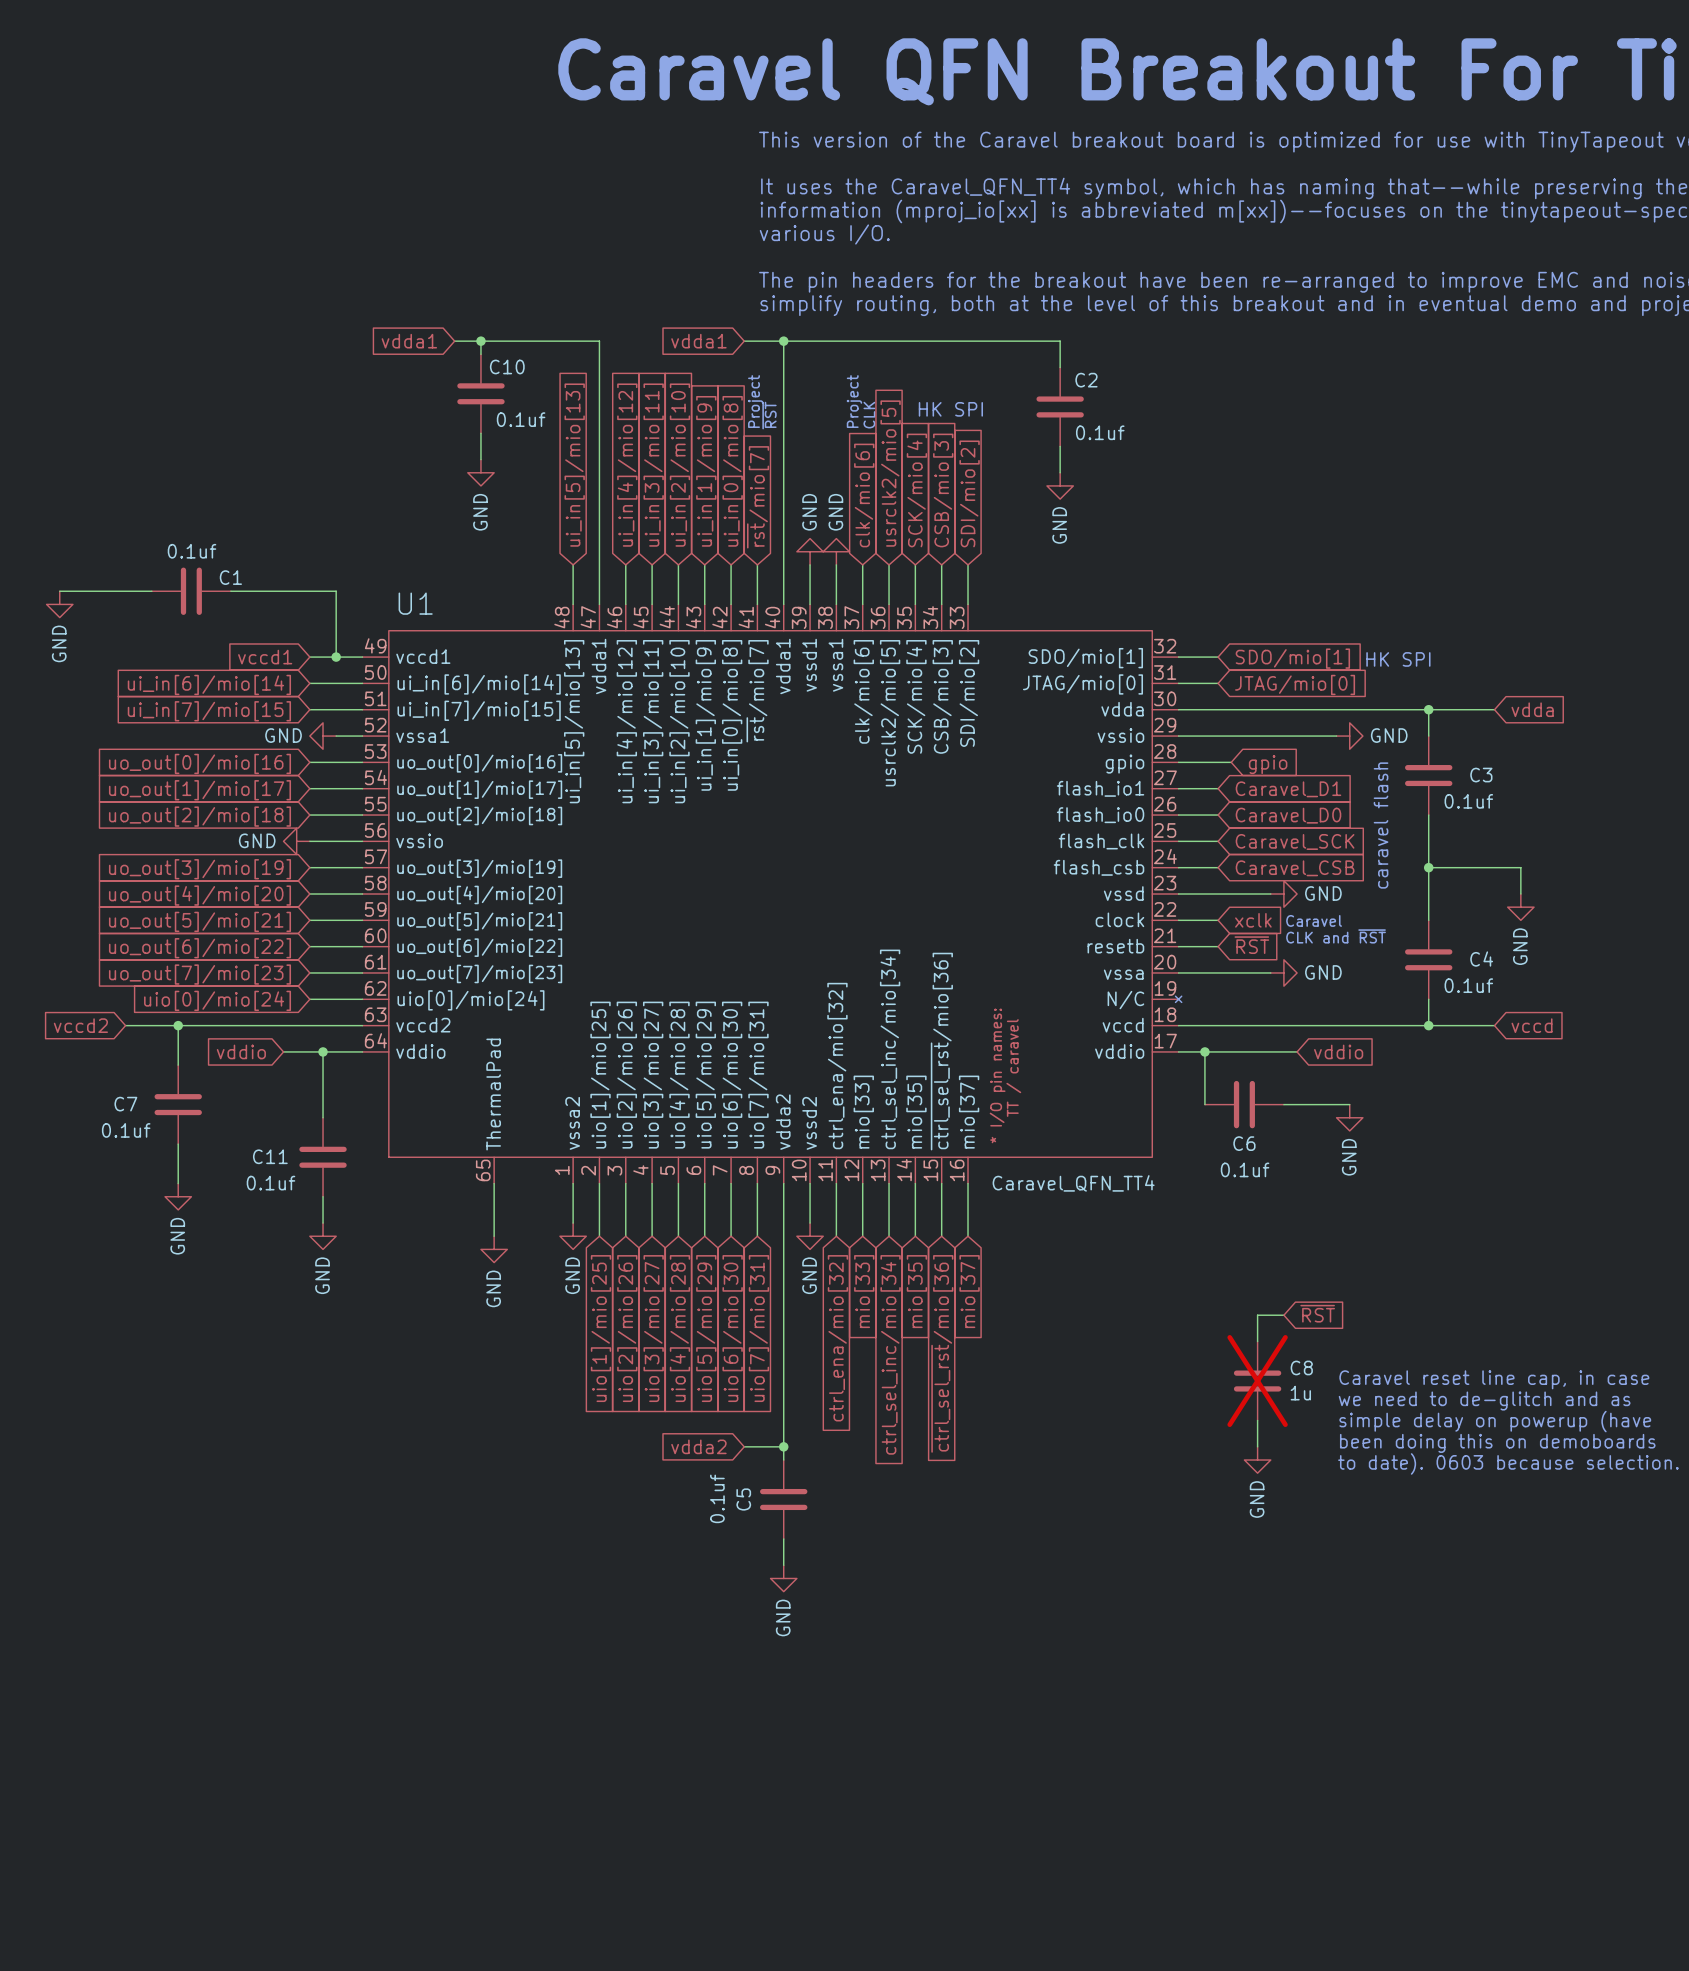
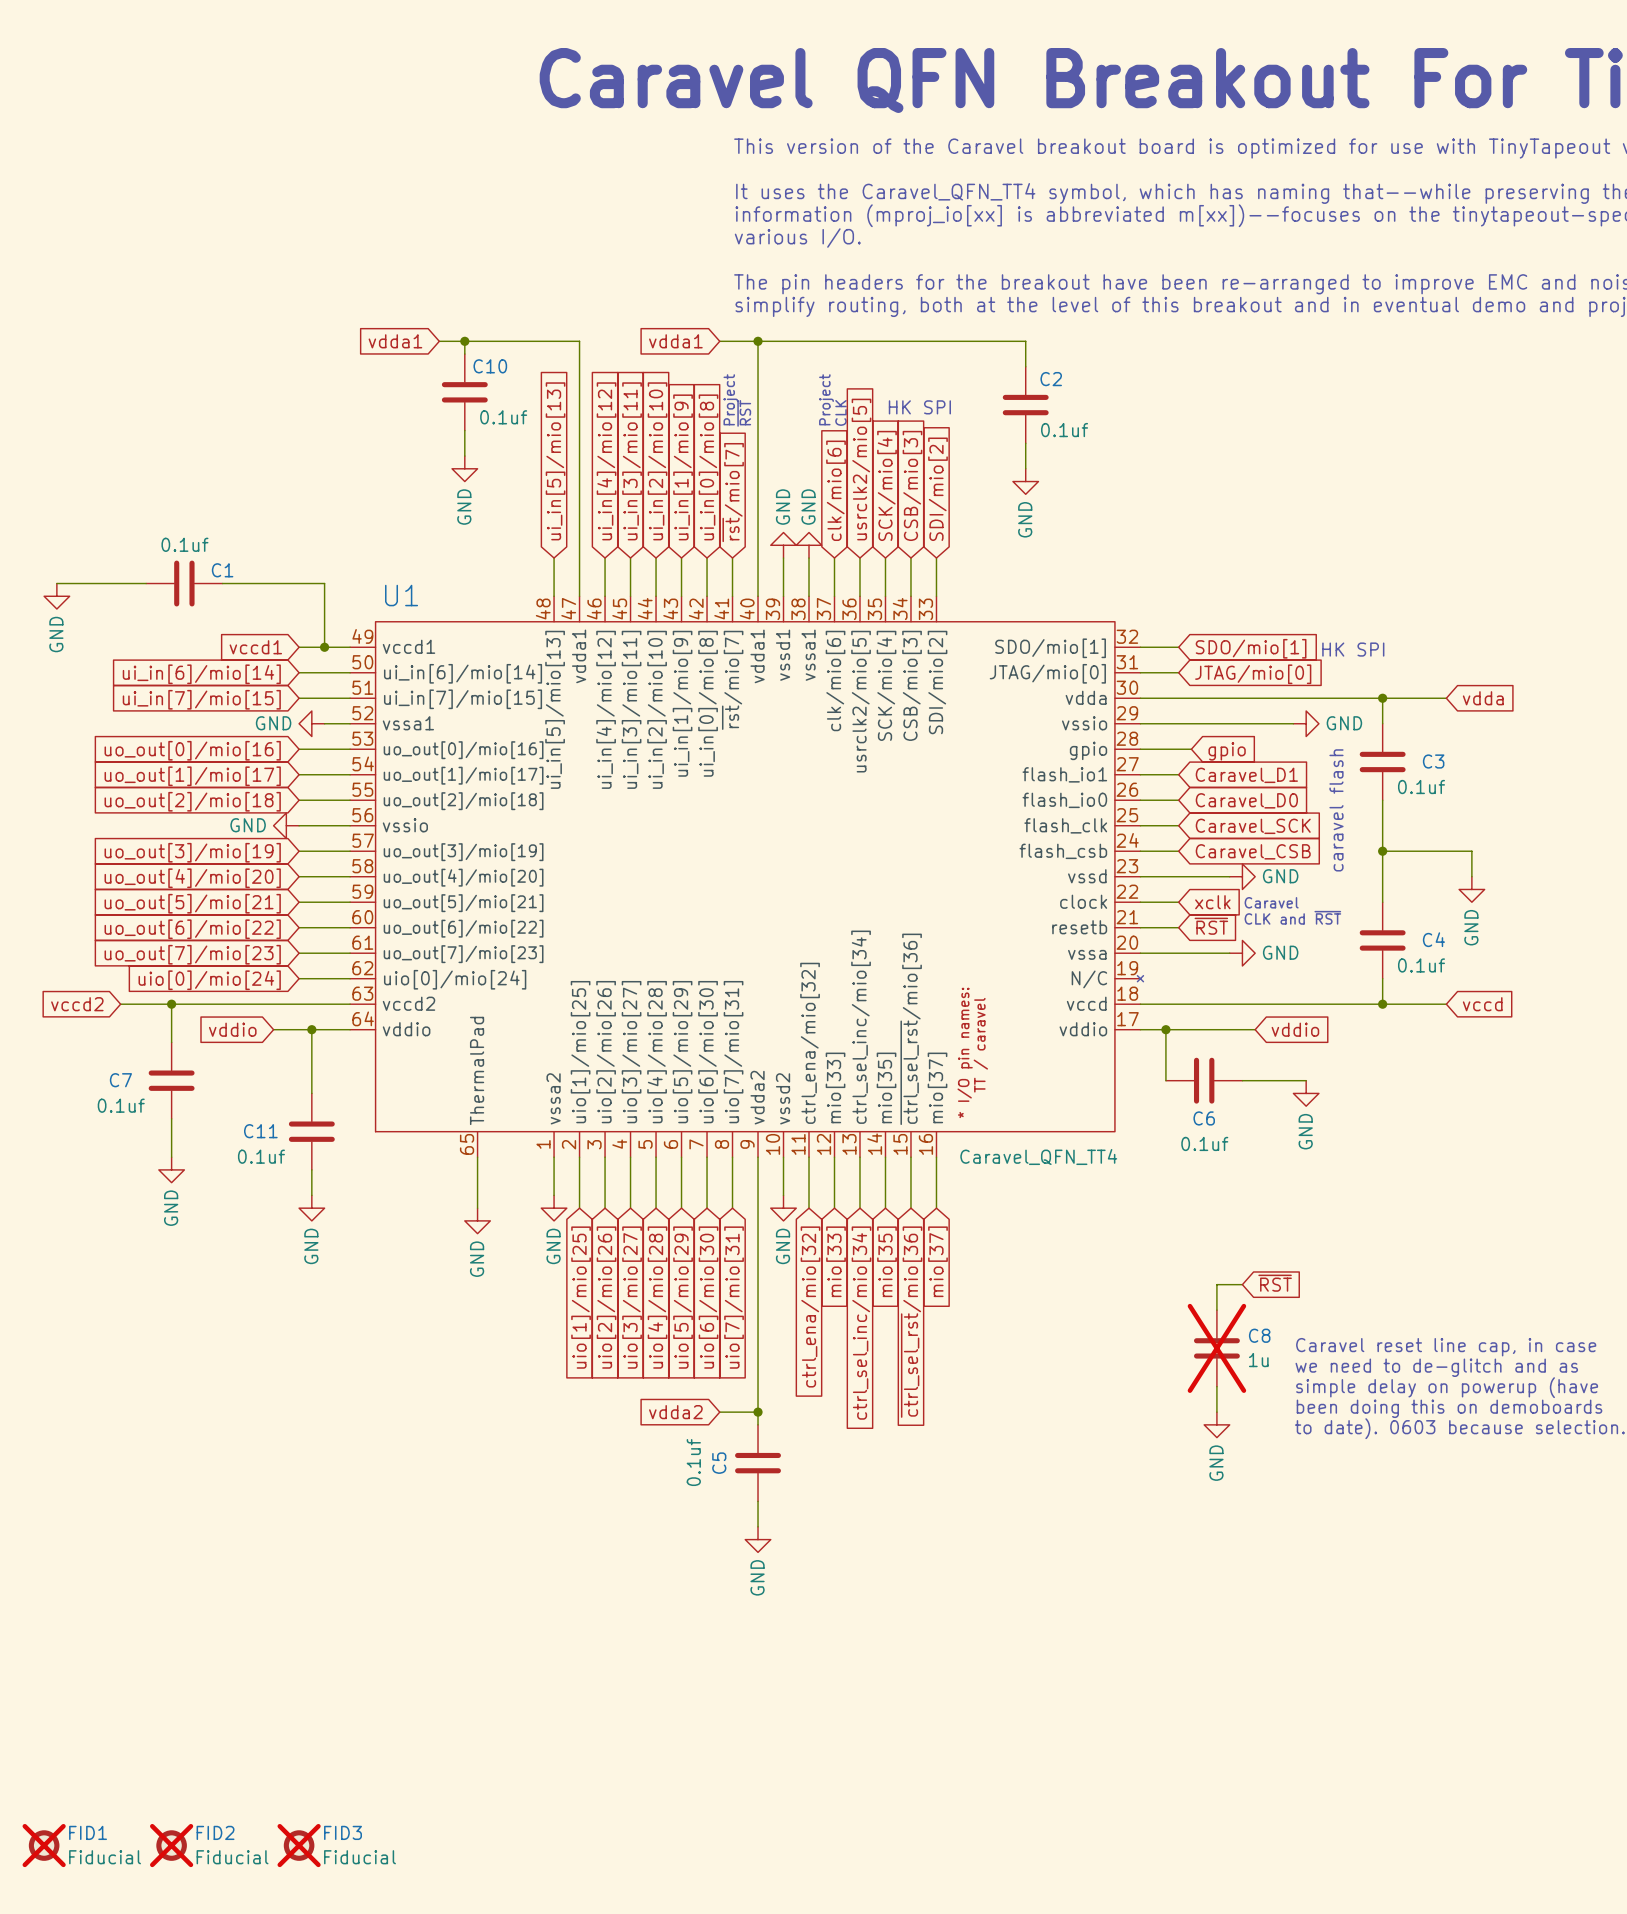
FID1: none -> Fiducial (44, 1845)
FID2: none -> Fiducial (171, 1845)
FID3: none -> Fiducial (299, 1845)

